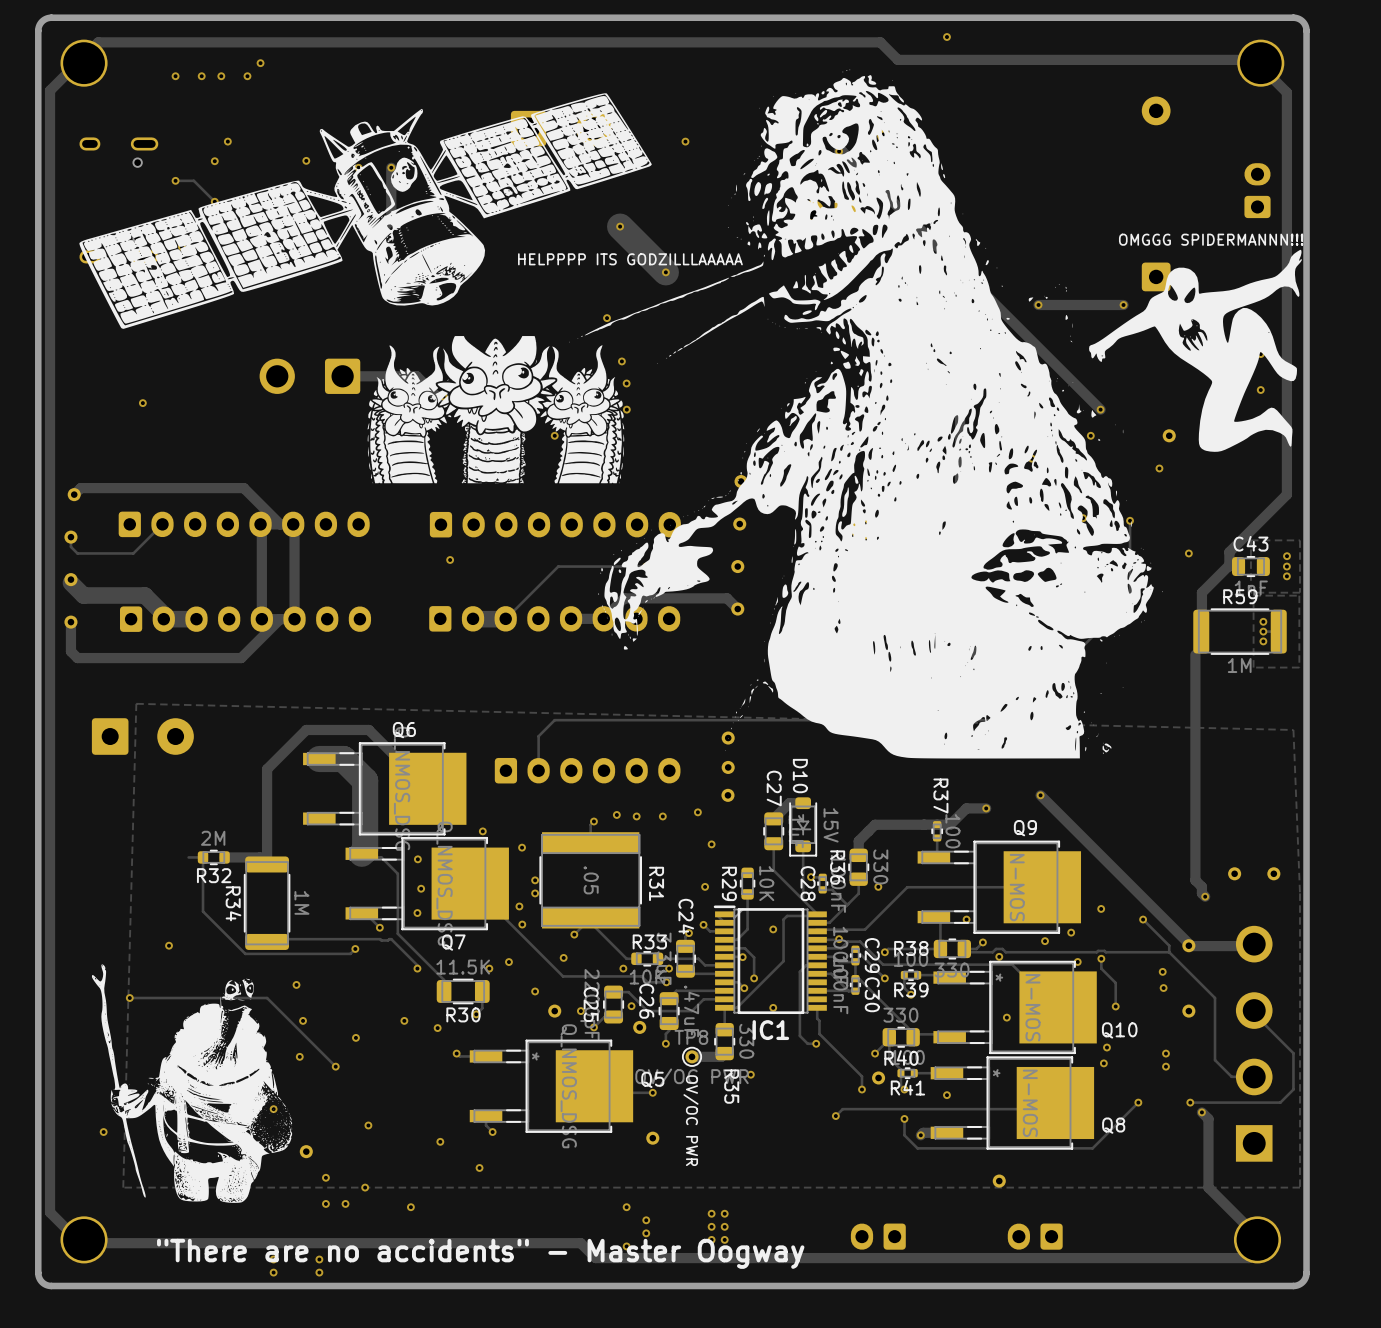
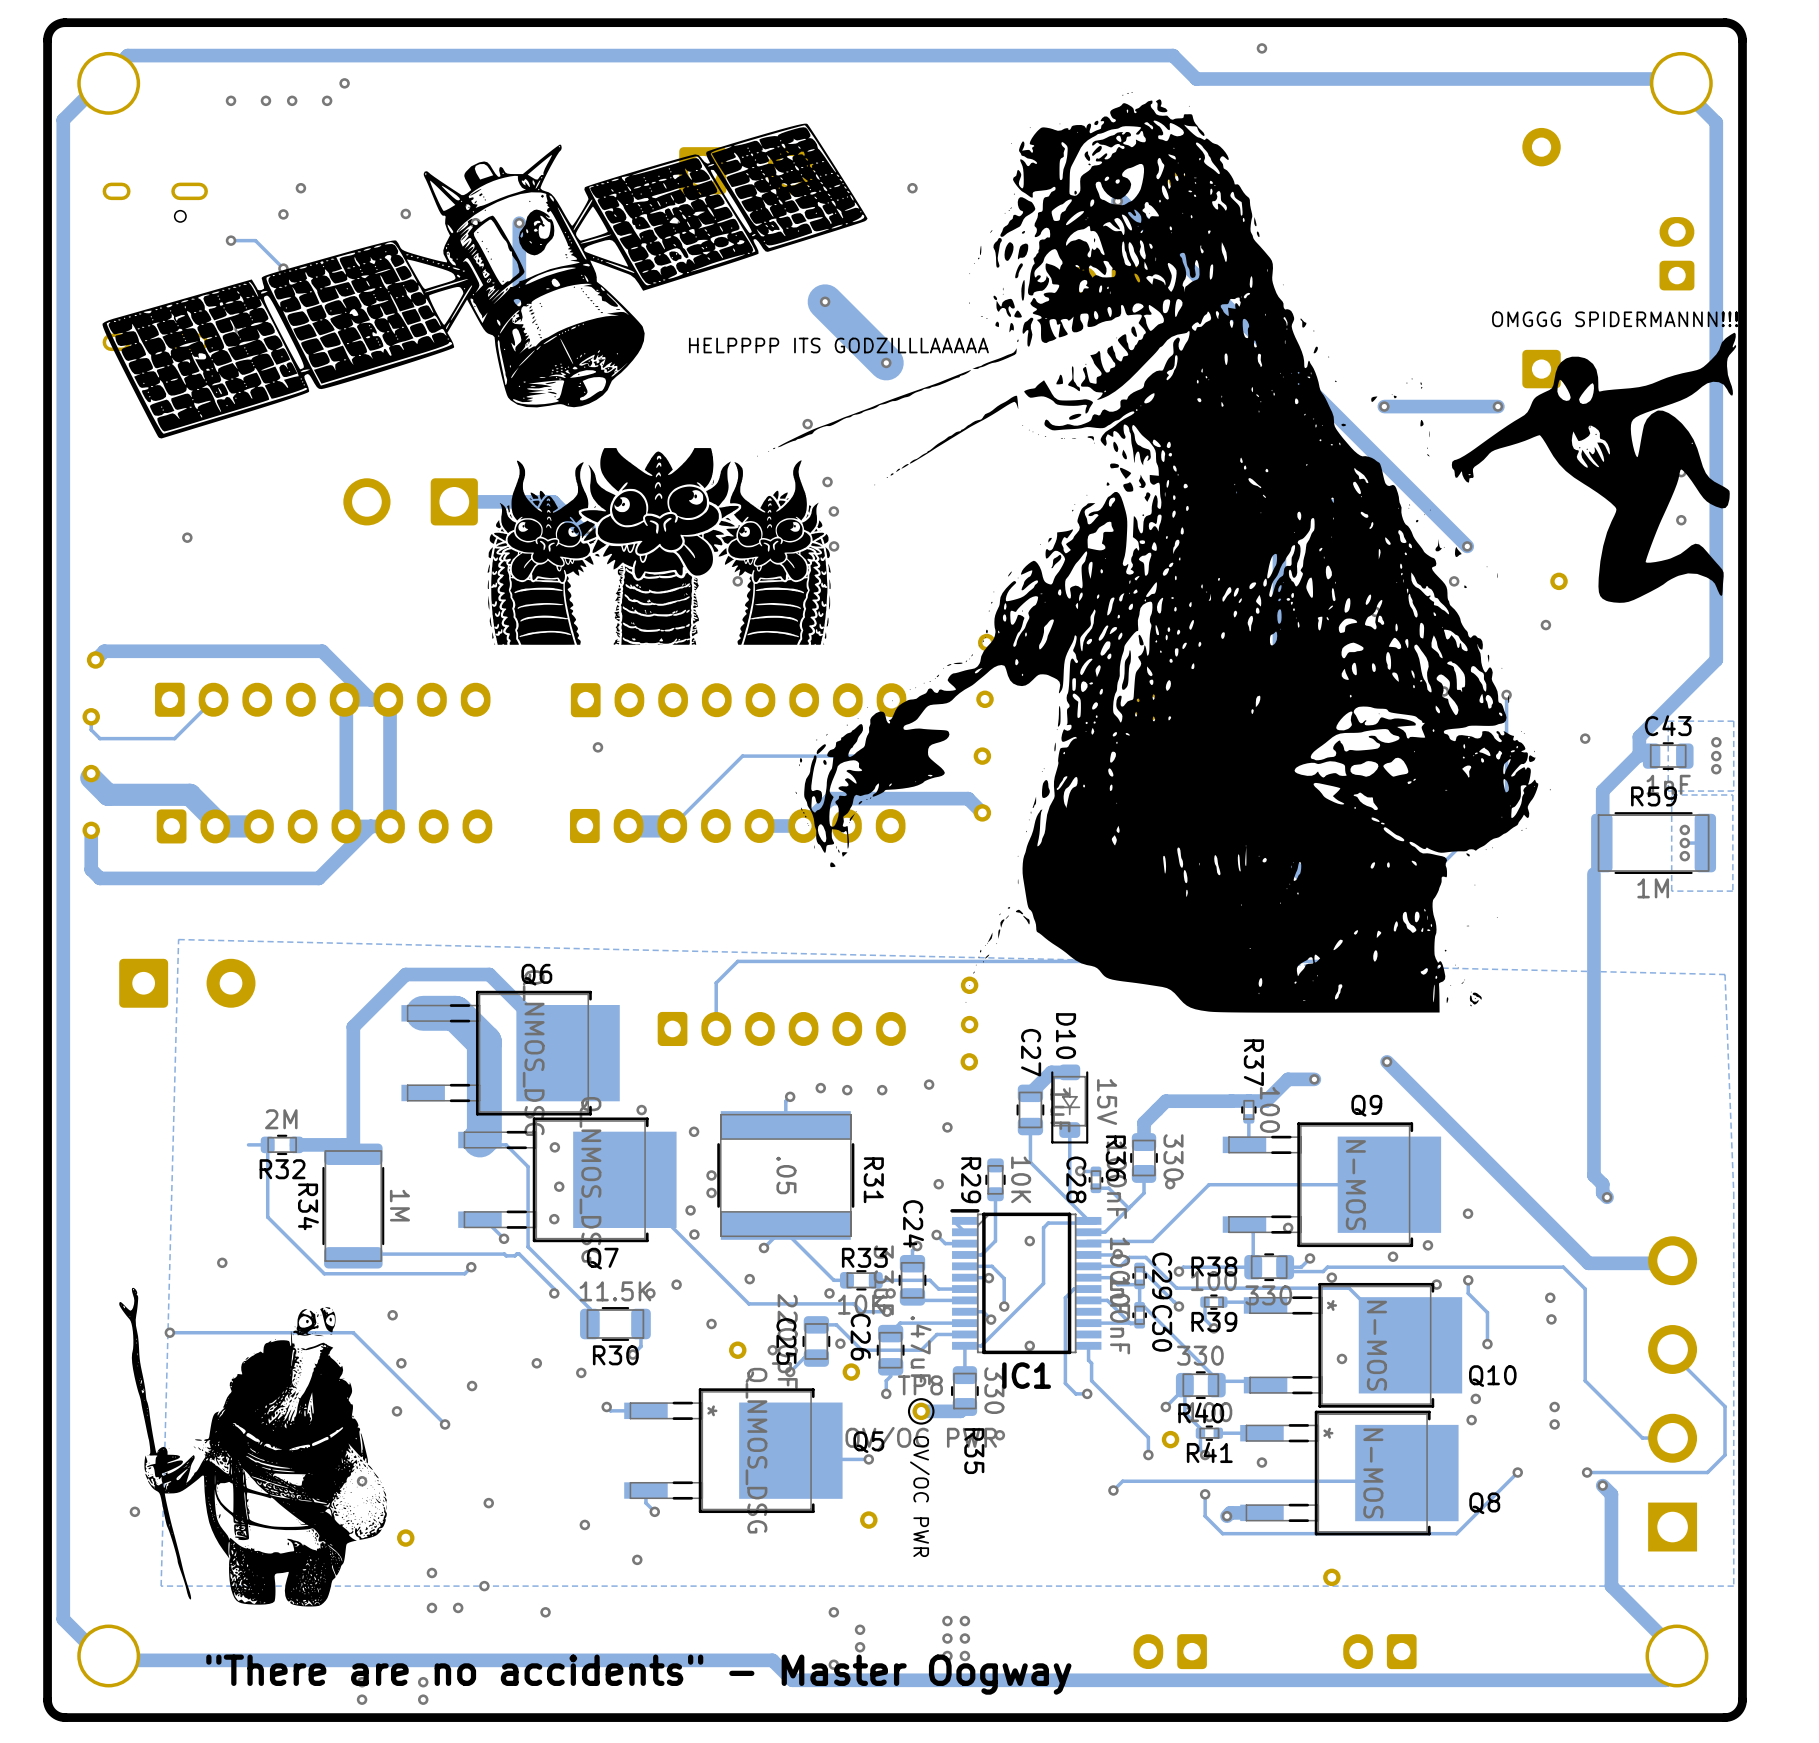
part: (1234, 873) -> none
part: (1273, 873) -> none
track: (1143, 919) (1169, 945) (1169, 952) -> none
via: (1143, 919) -> none
part: (1188, 945) -> none
track: (1002, 948) (1005, 952) (1169, 952) -> (1336, 1267) (1563, 1267) (1585, 1289) (1585, 1380) (1620, 1415)
track: (1169, 952) (1215, 998) (1215, 1060) -> none
part: (1188, 1011) -> none

